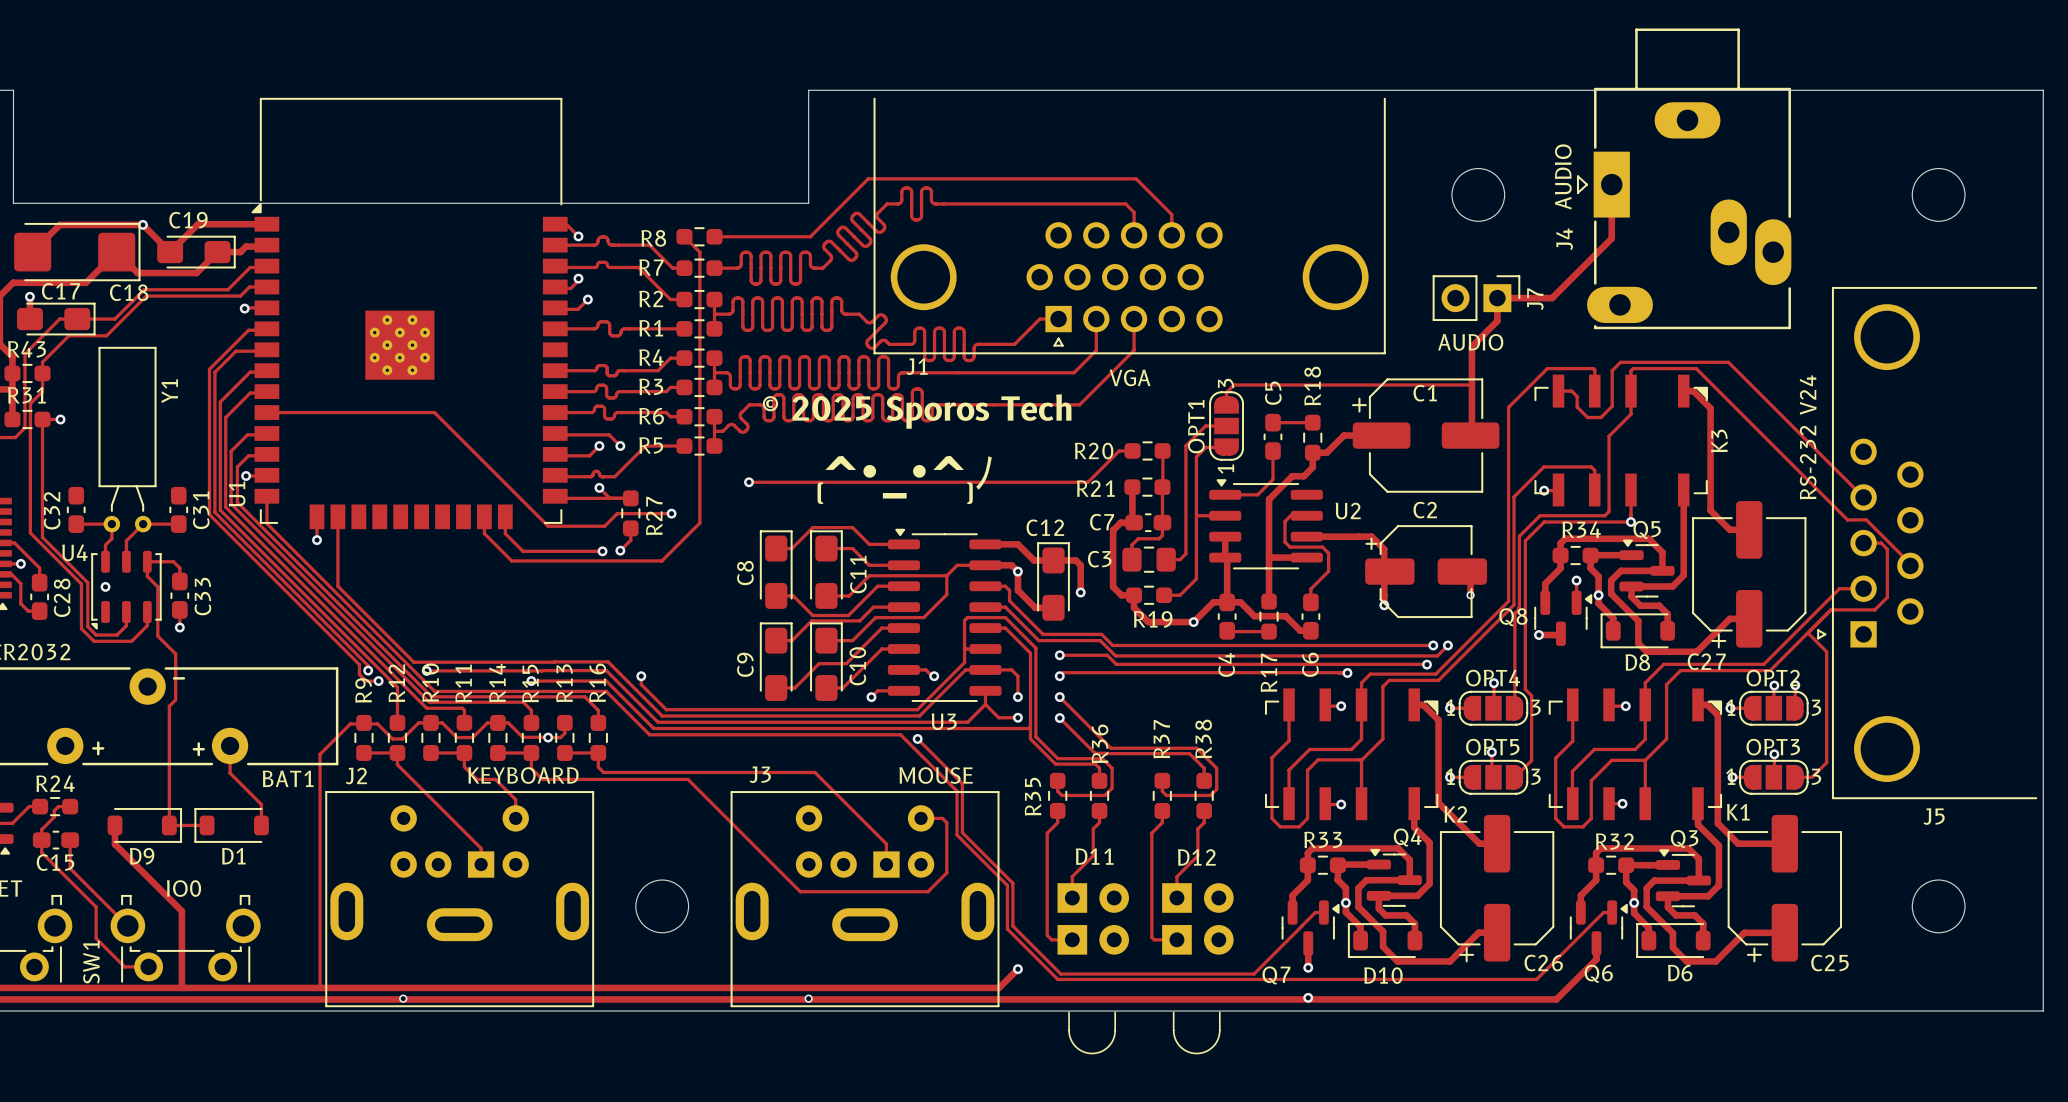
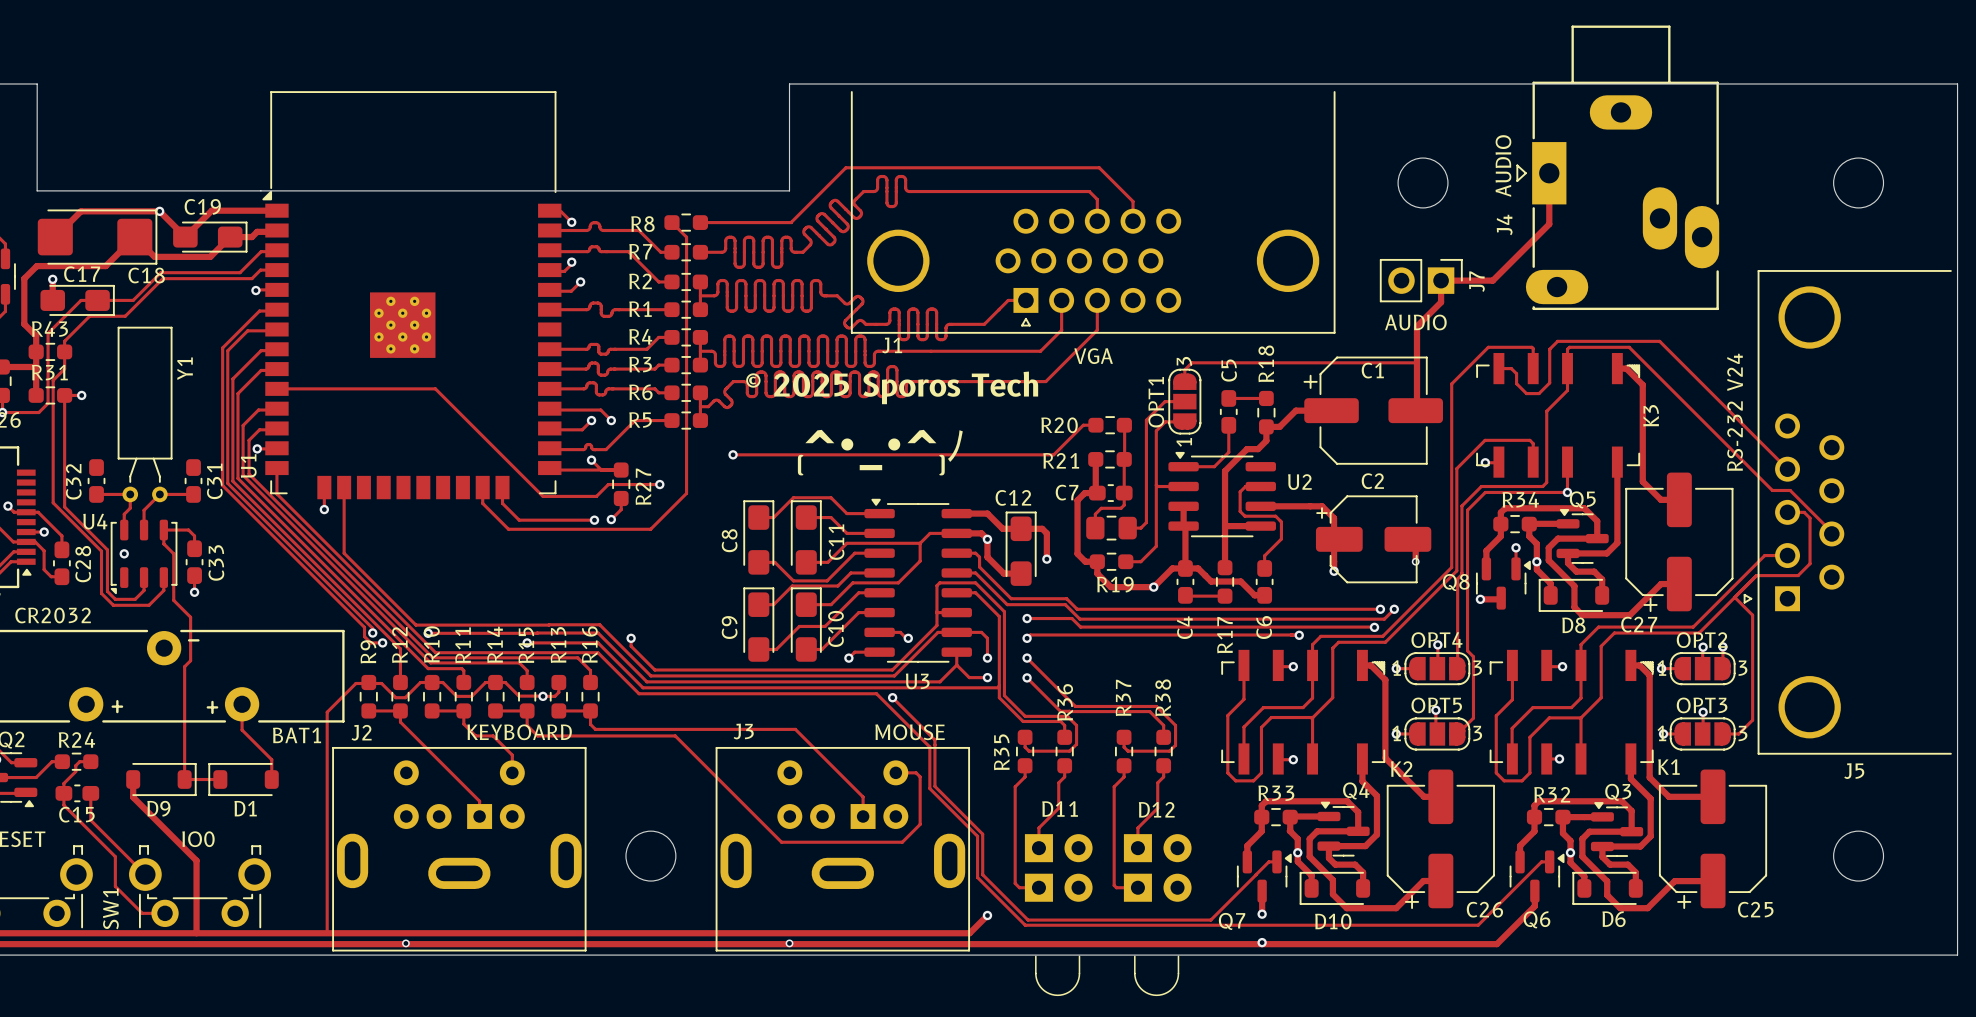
C3 name: C3 (1099, 559) -> none

